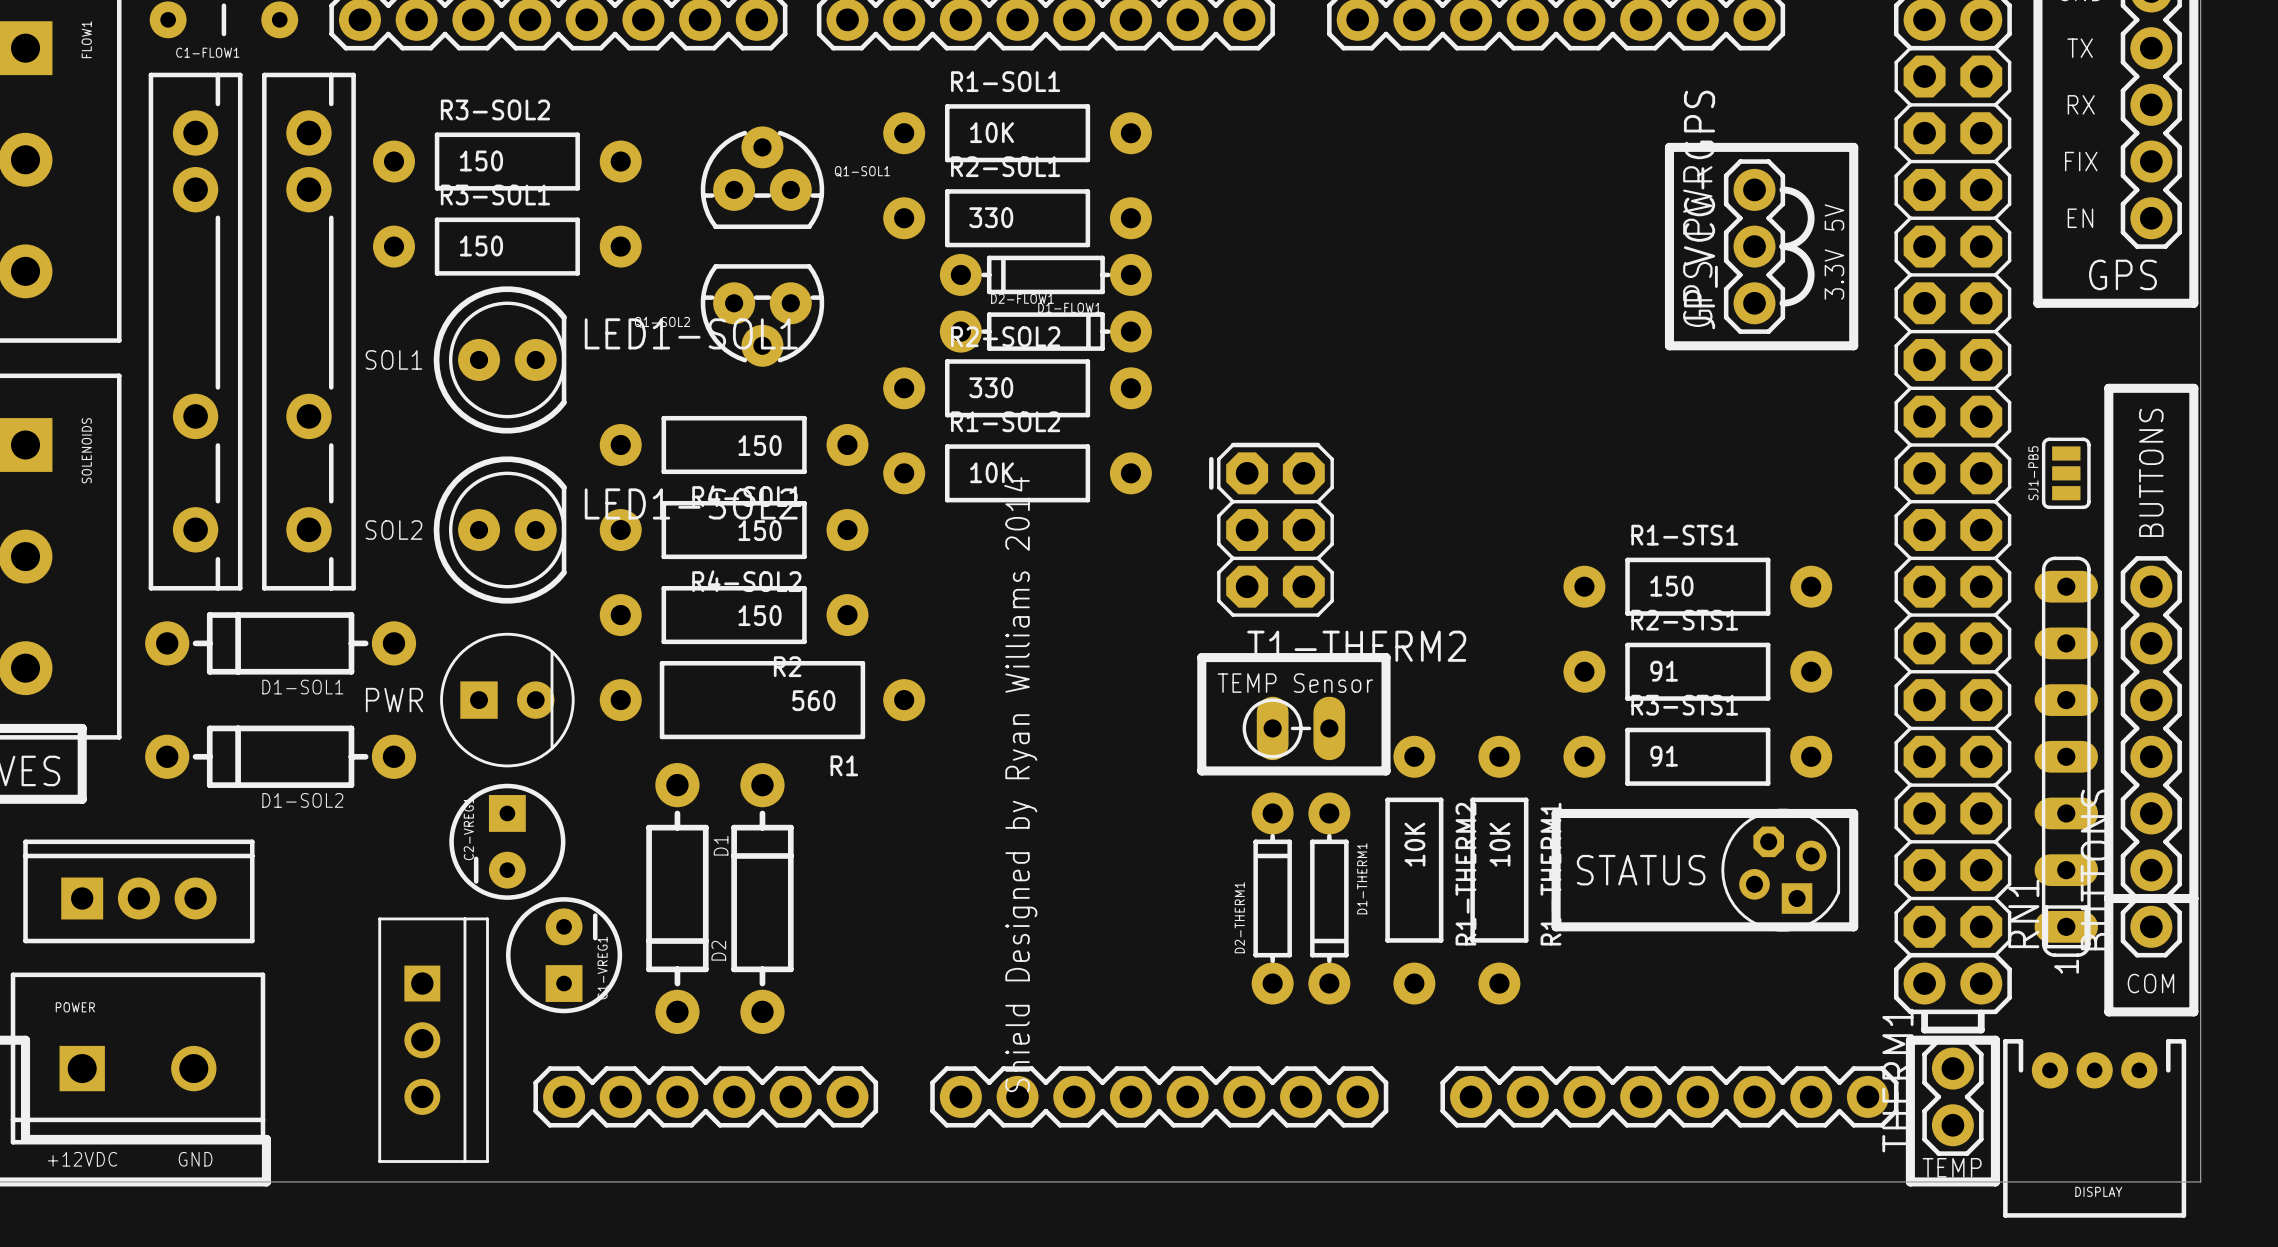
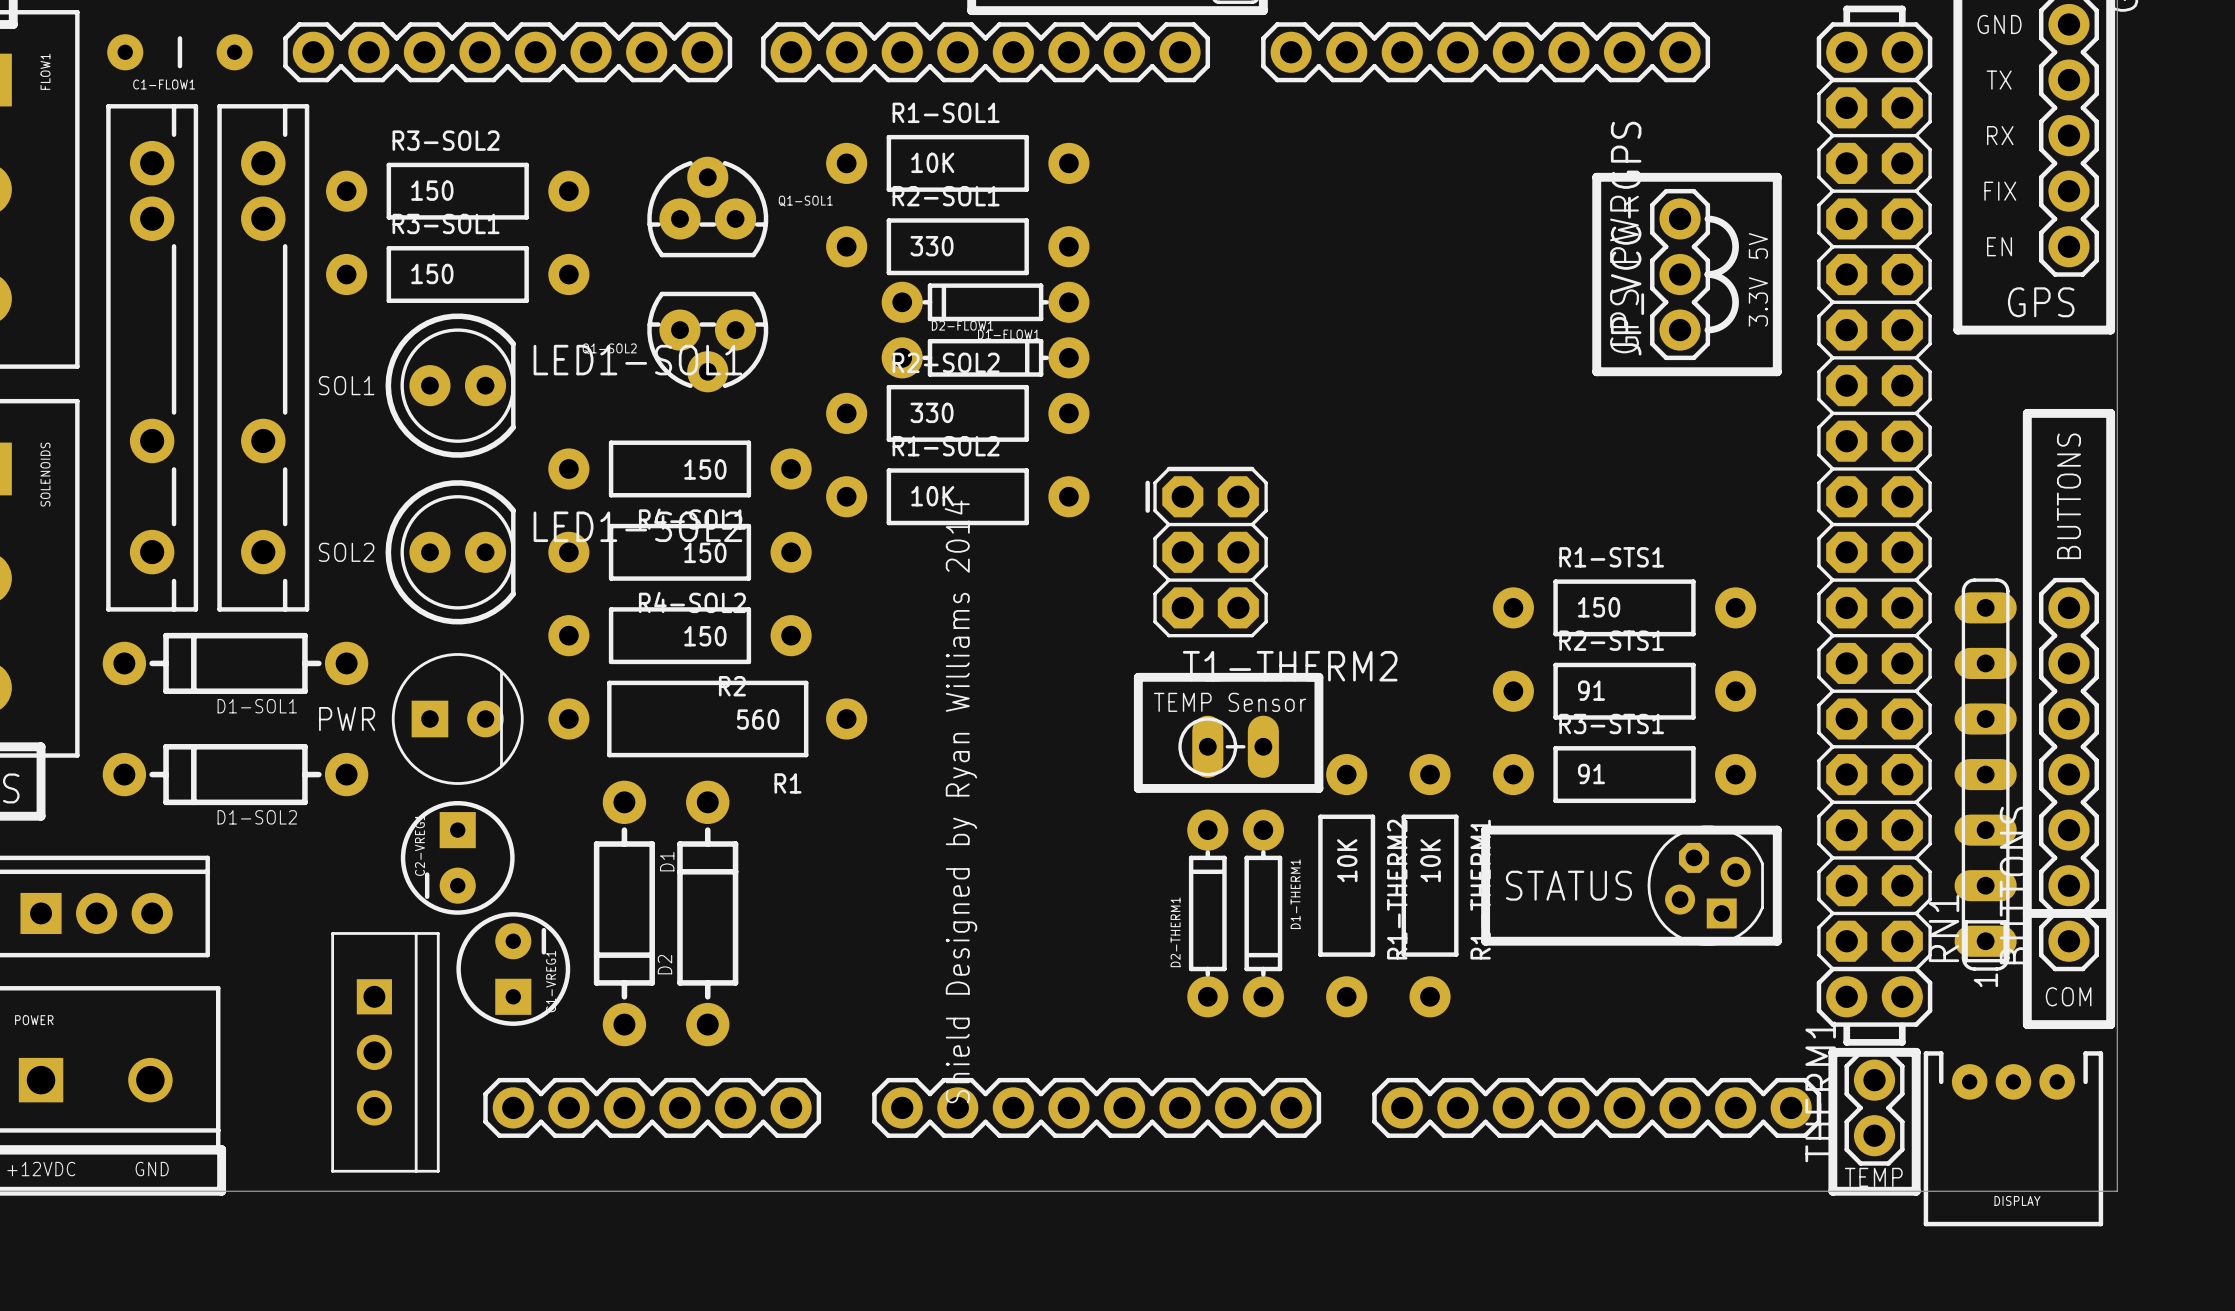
SJ1-PB5: (2066, 473) -> none

